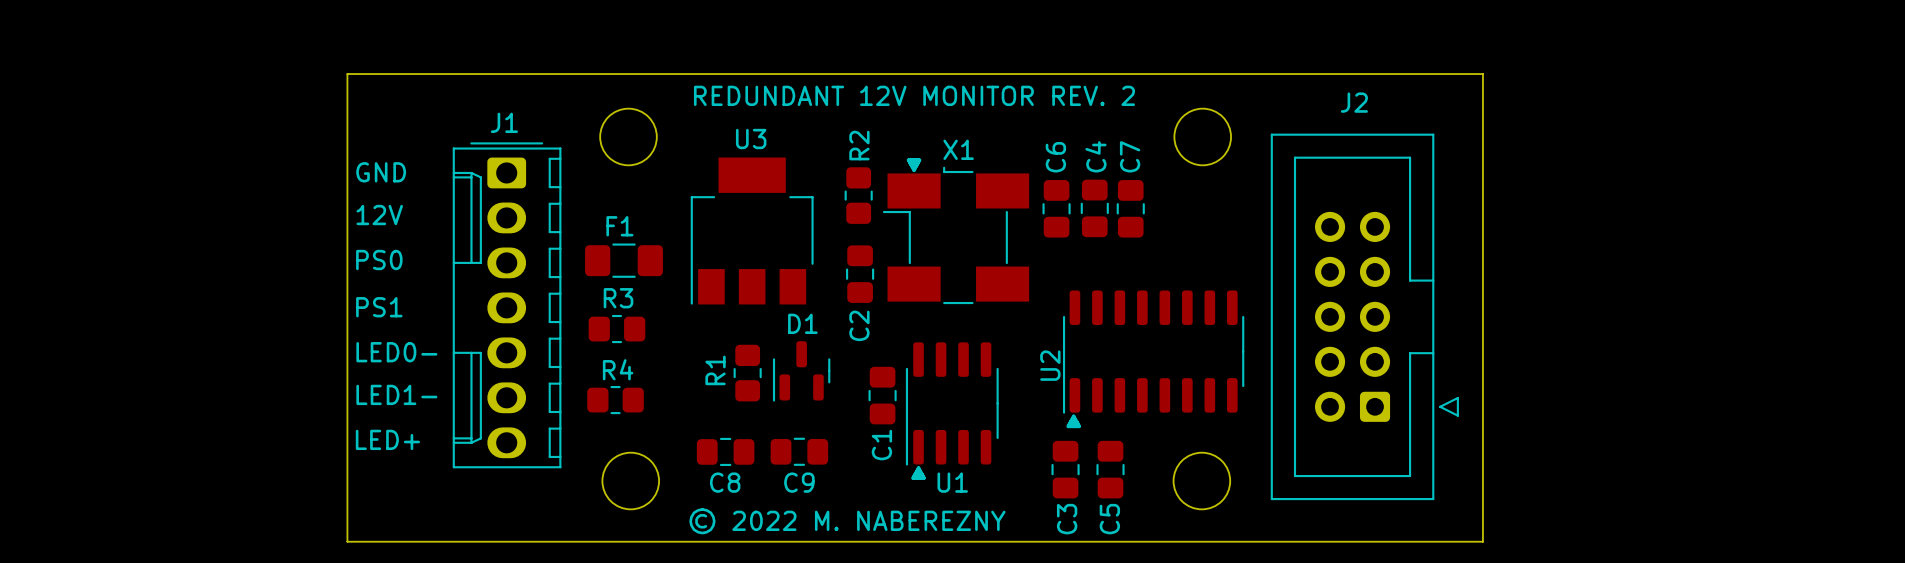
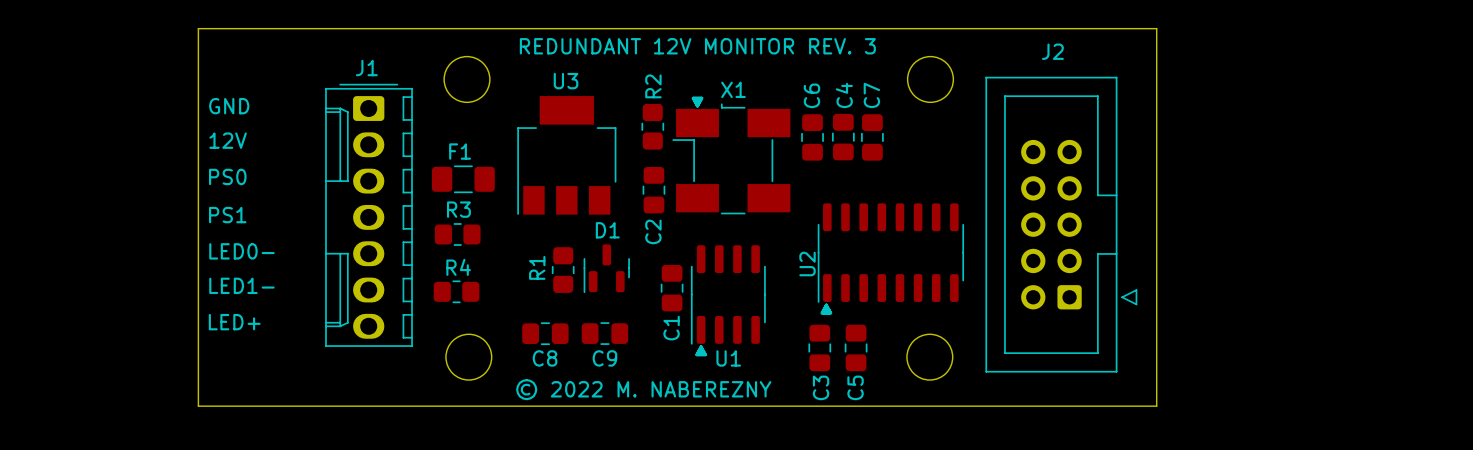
board edge: (347, 74) (347, 541) -> (240, 28) (198, 28) (198, 406) (240, 406)
text: REDUNDANT 12V MONITOR REV. 2 (914, 95) -> REDUNDANT 12V MONITOR REV. 3 (697, 46)
text position: GND (381, 172) -> GND (229, 106)
text position: 12V (379, 215) -> 12V (228, 140)
text position: PS0 (379, 260) -> PS0 (227, 176)
text position: PS1 (379, 307) -> PS1 (227, 215)
text position: LED0- (396, 352) -> LED0- (241, 251)
text position: LED1- (396, 394) -> LED1- (241, 285)
text position: LED+ (387, 439) -> LED+ (234, 322)

